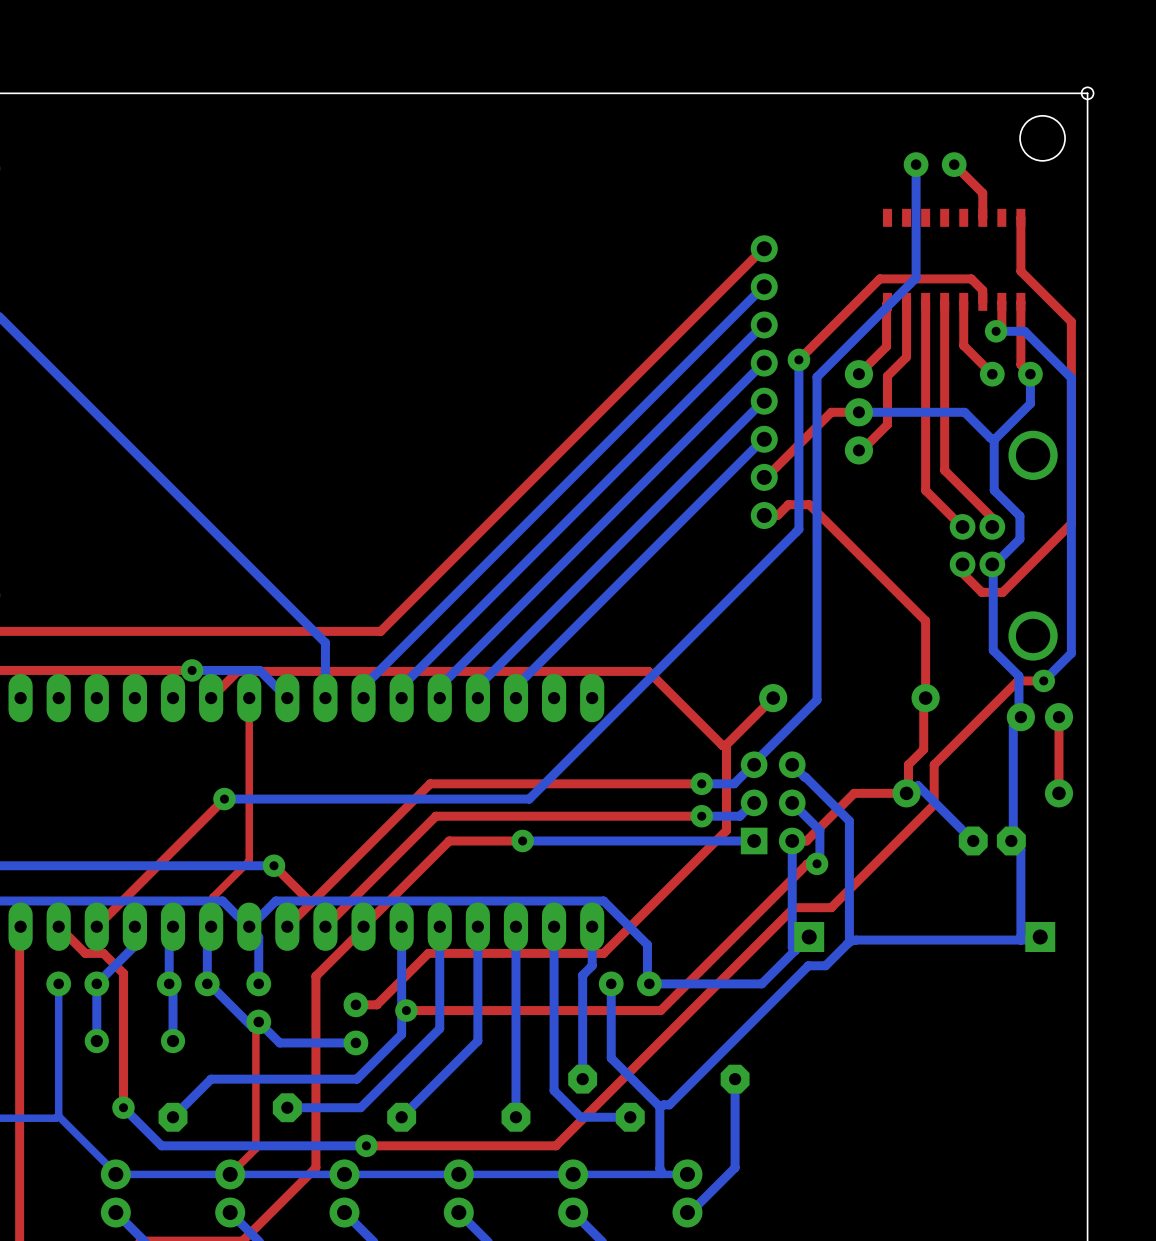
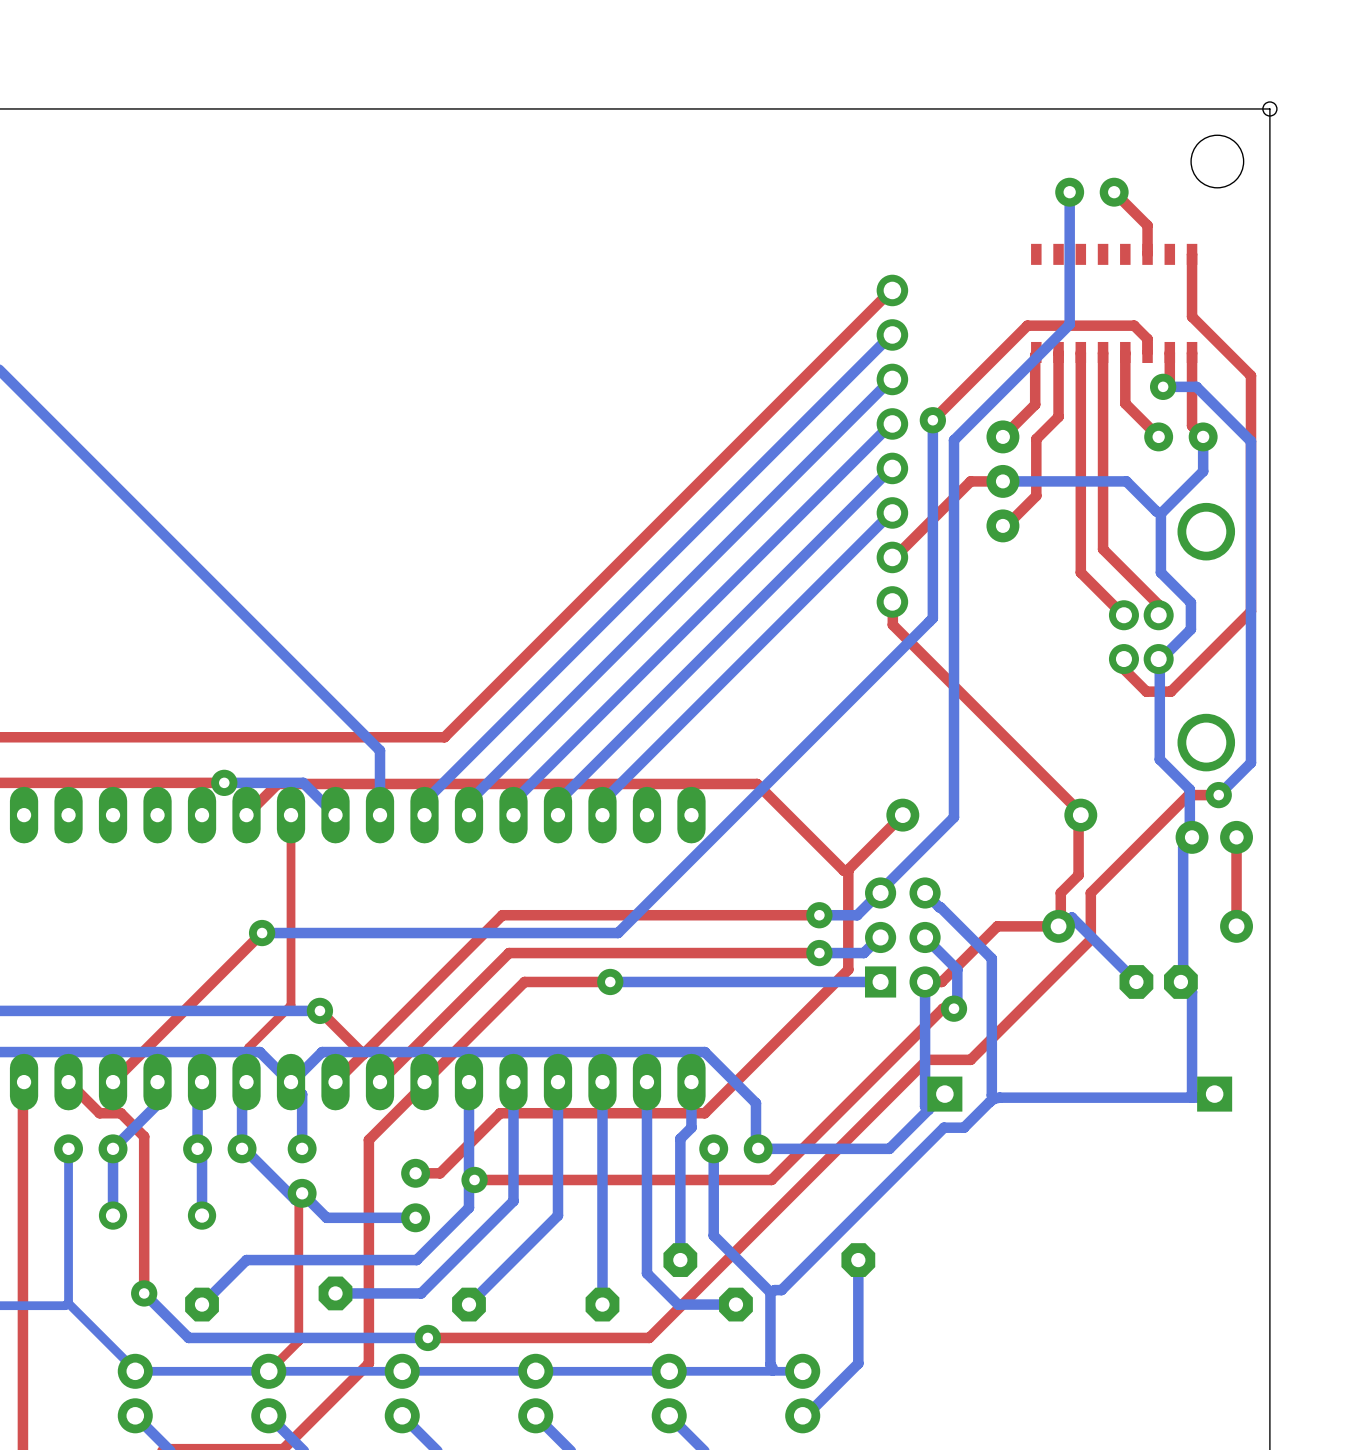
top track: (764, 515) (777, 515) (788, 504) (809, 504) (925, 620) (925, 698) -> (892, 601) (892, 624) (1078, 810) (1080, 815)

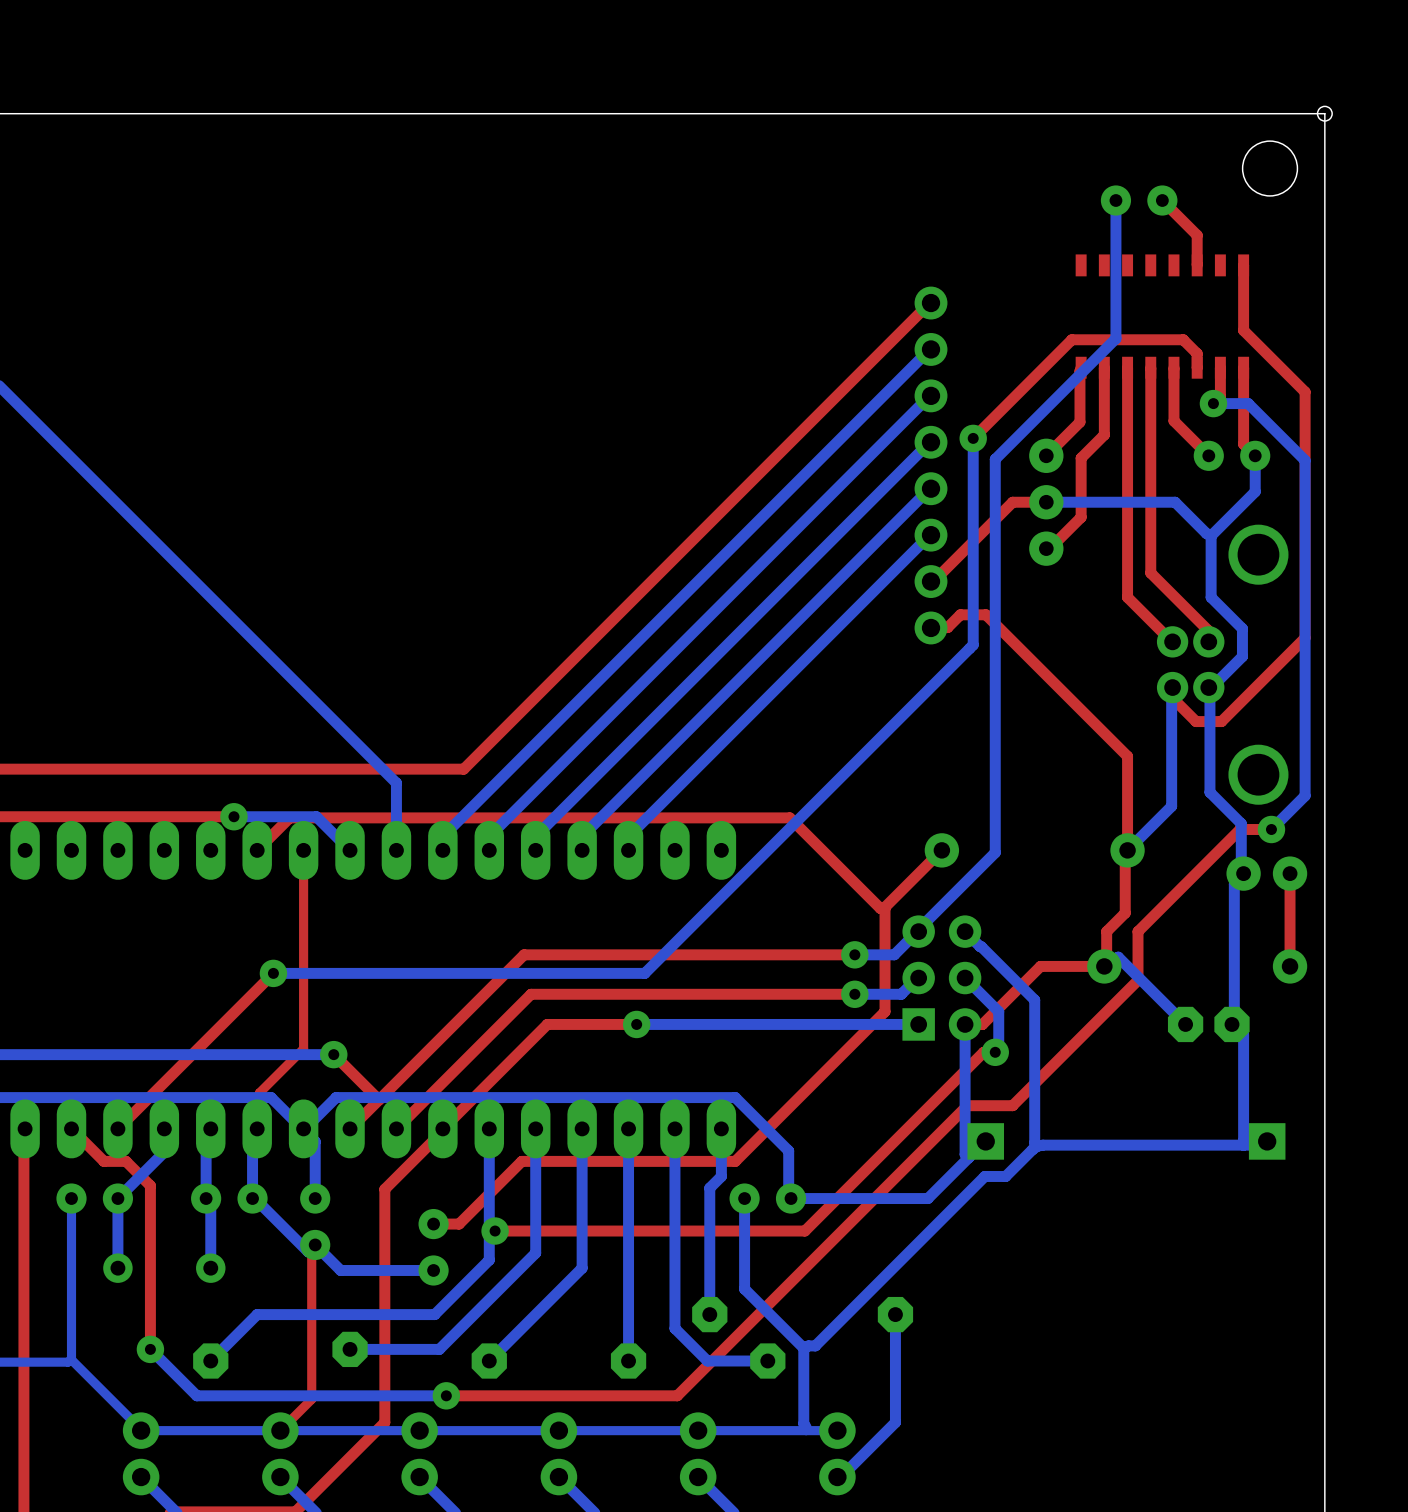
top track: (892, 601) (892, 624) (1078, 810) (1080, 815) -> (931, 627) (947, 627) (960, 614) (985, 614) (1127, 756) (1127, 850)
bottom track: none -> (1172, 687) (1171, 806) (1127, 850)

